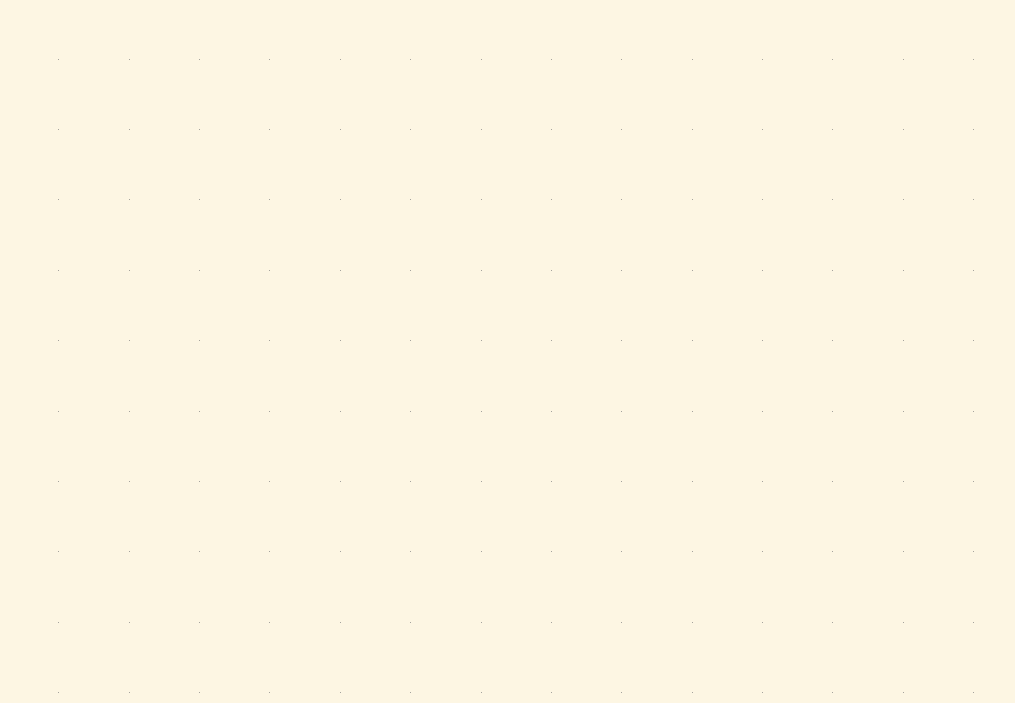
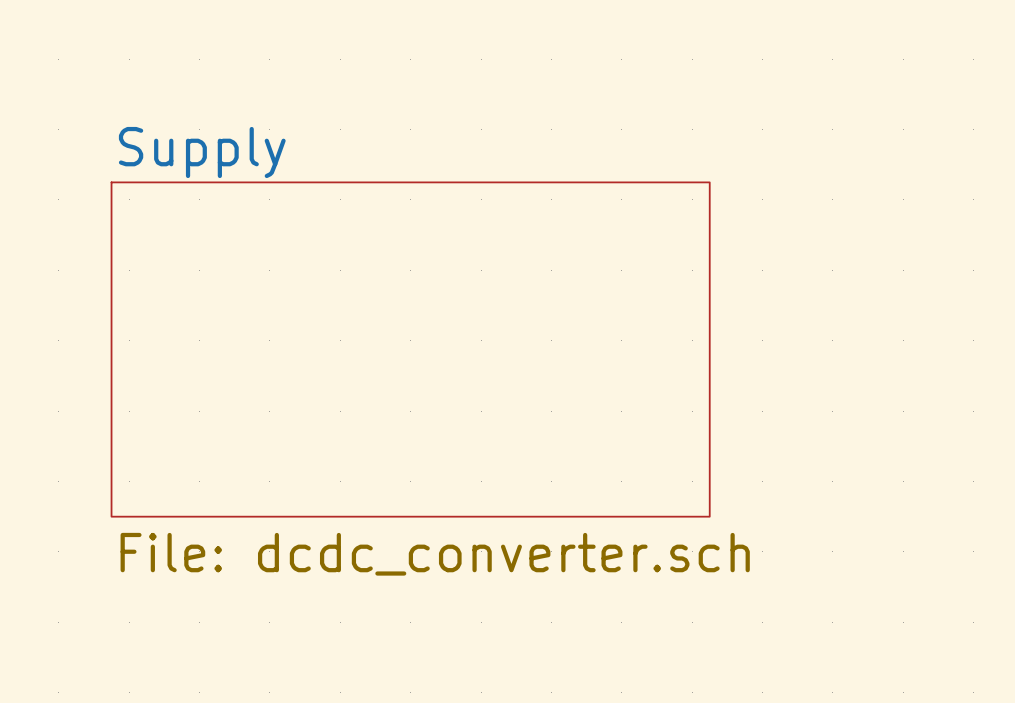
sheet Supply: none -> File: dcdc_converter.sch (410, 349)

